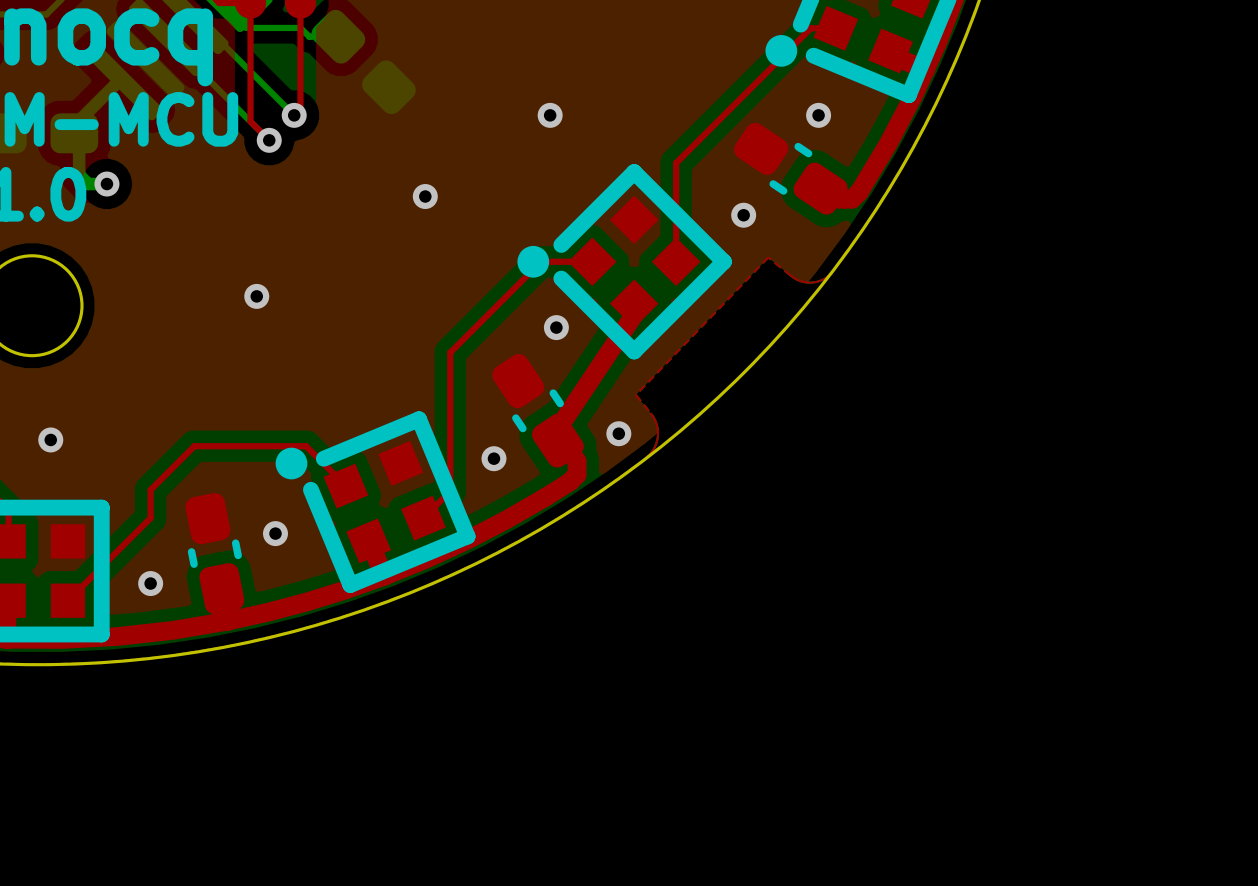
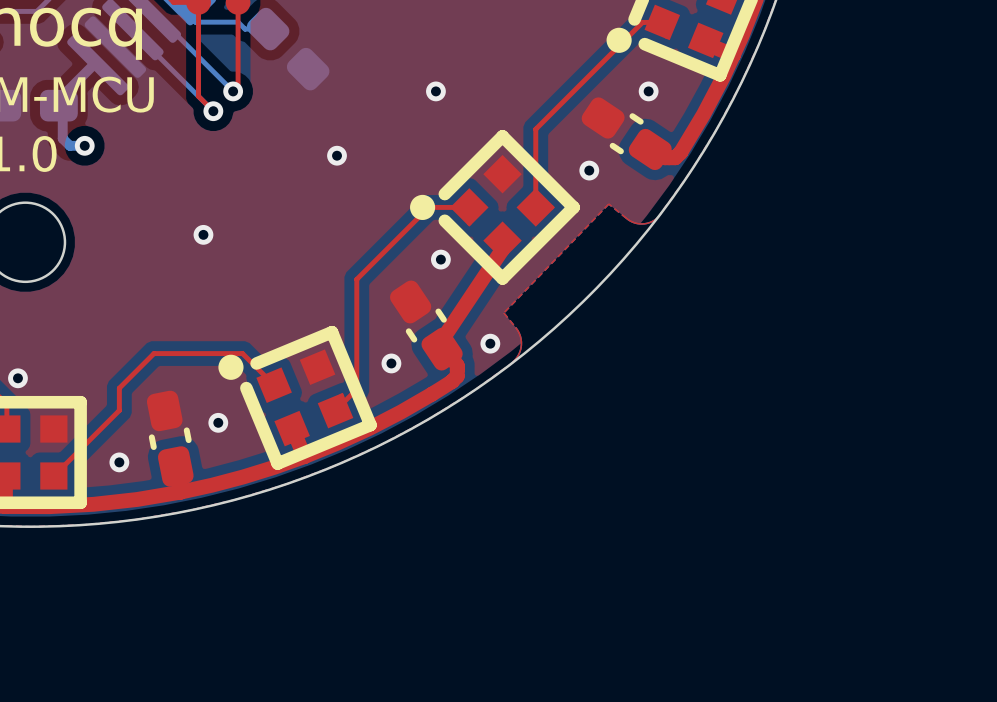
via position: (50, 439) -> (17, 378)

